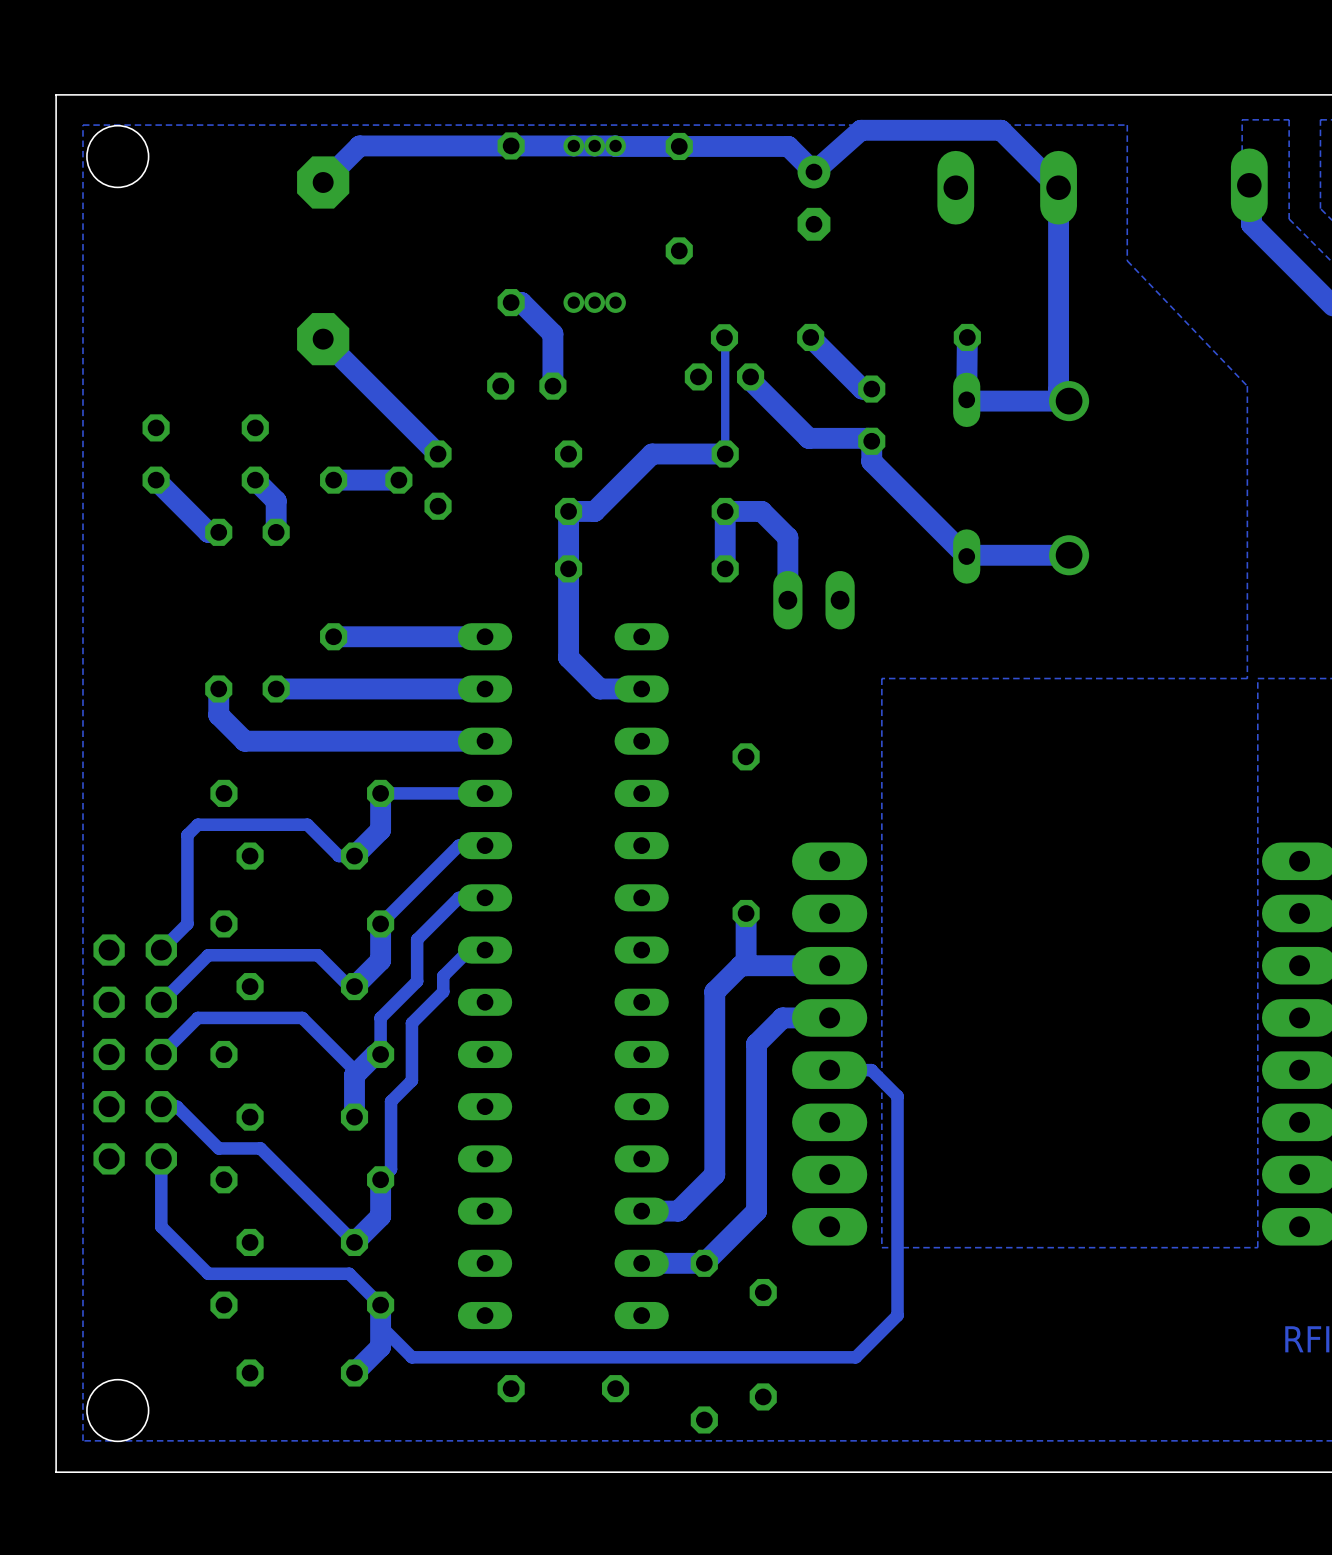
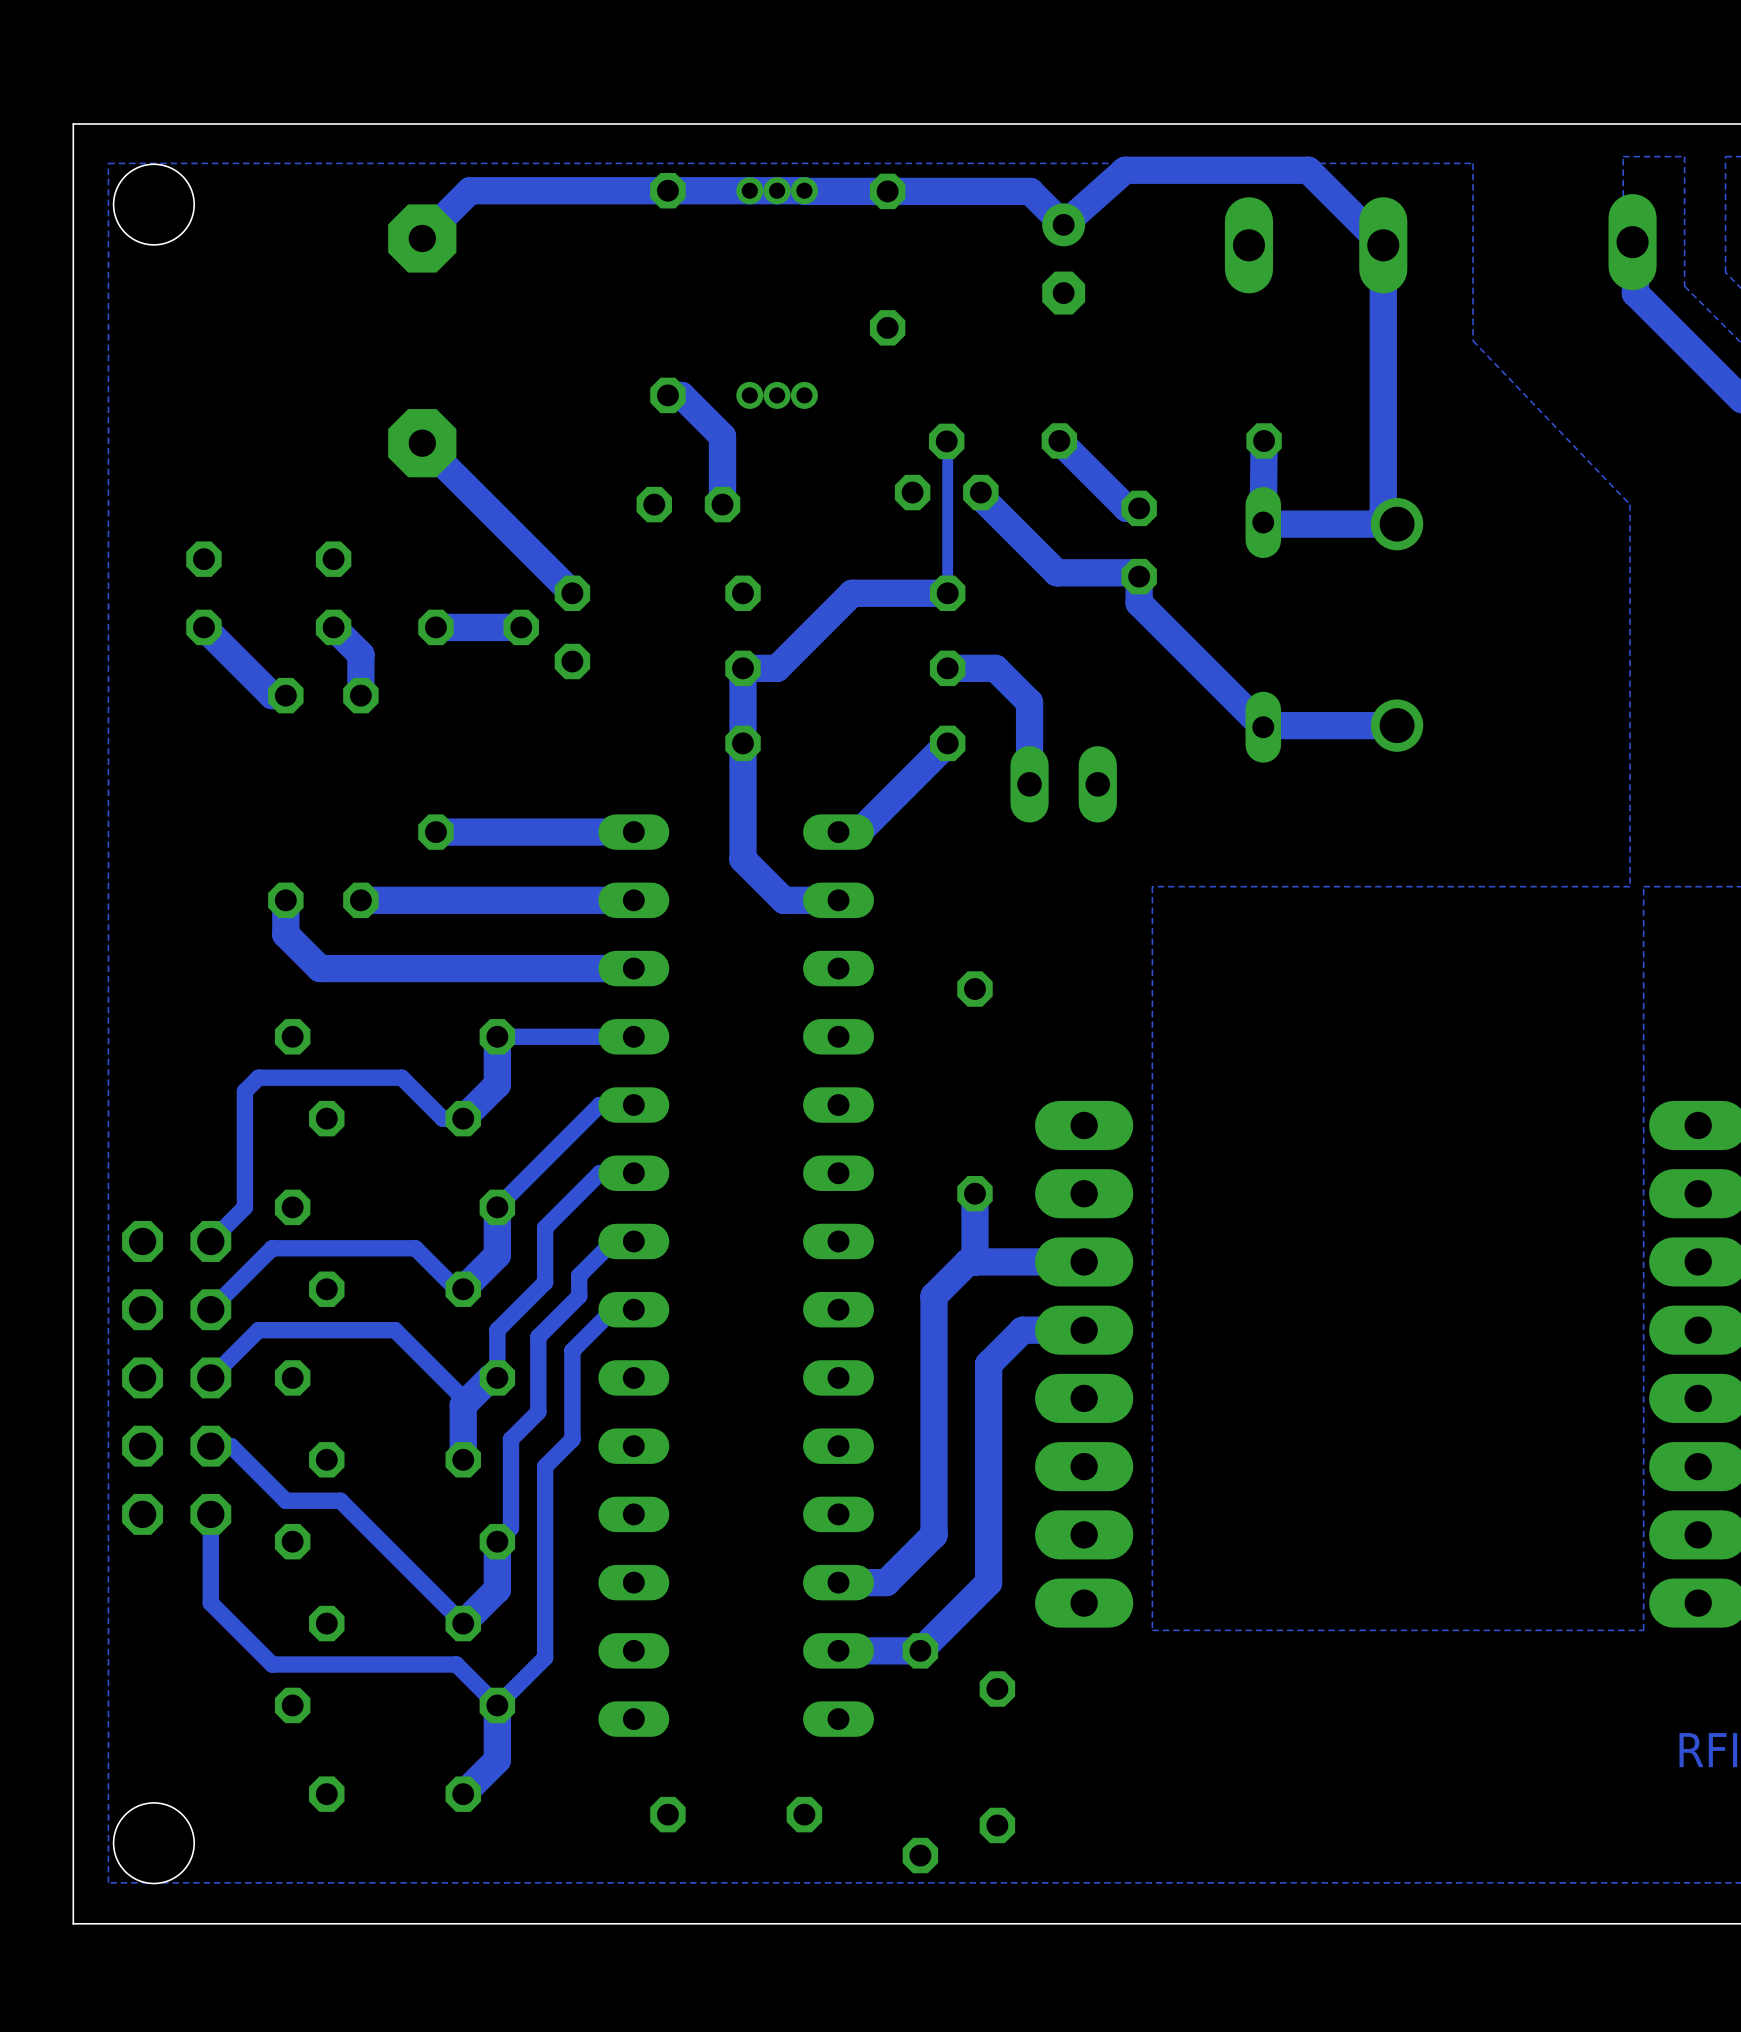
track: (725, 511) (725, 568) -> (858, 832) (947, 743)
track: (829, 1070) (871, 1070) (897, 1096) (897, 1315) (855, 1357) (411, 1357) (380, 1325) (380, 1305) -> (633, 1309) (613, 1309) (572, 1350) (572, 1439) (545, 1466) (545, 1657) (497, 1705)

